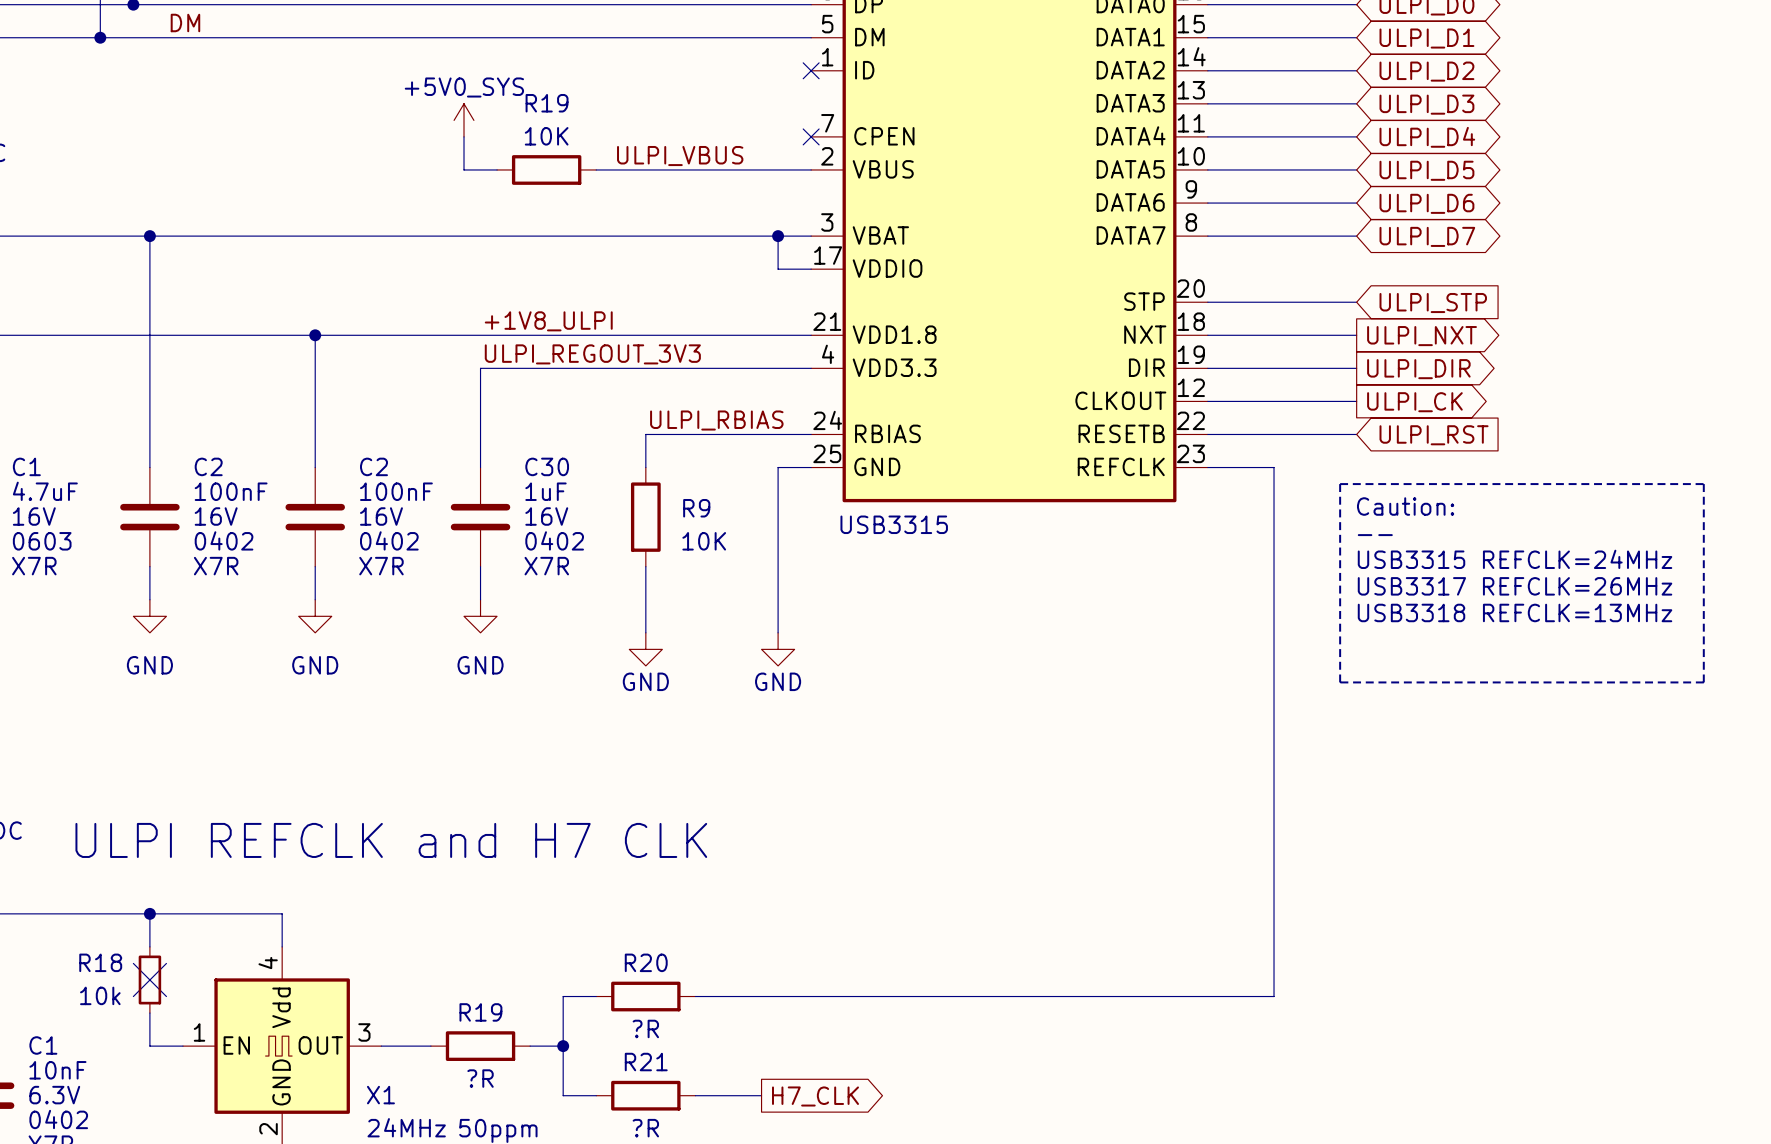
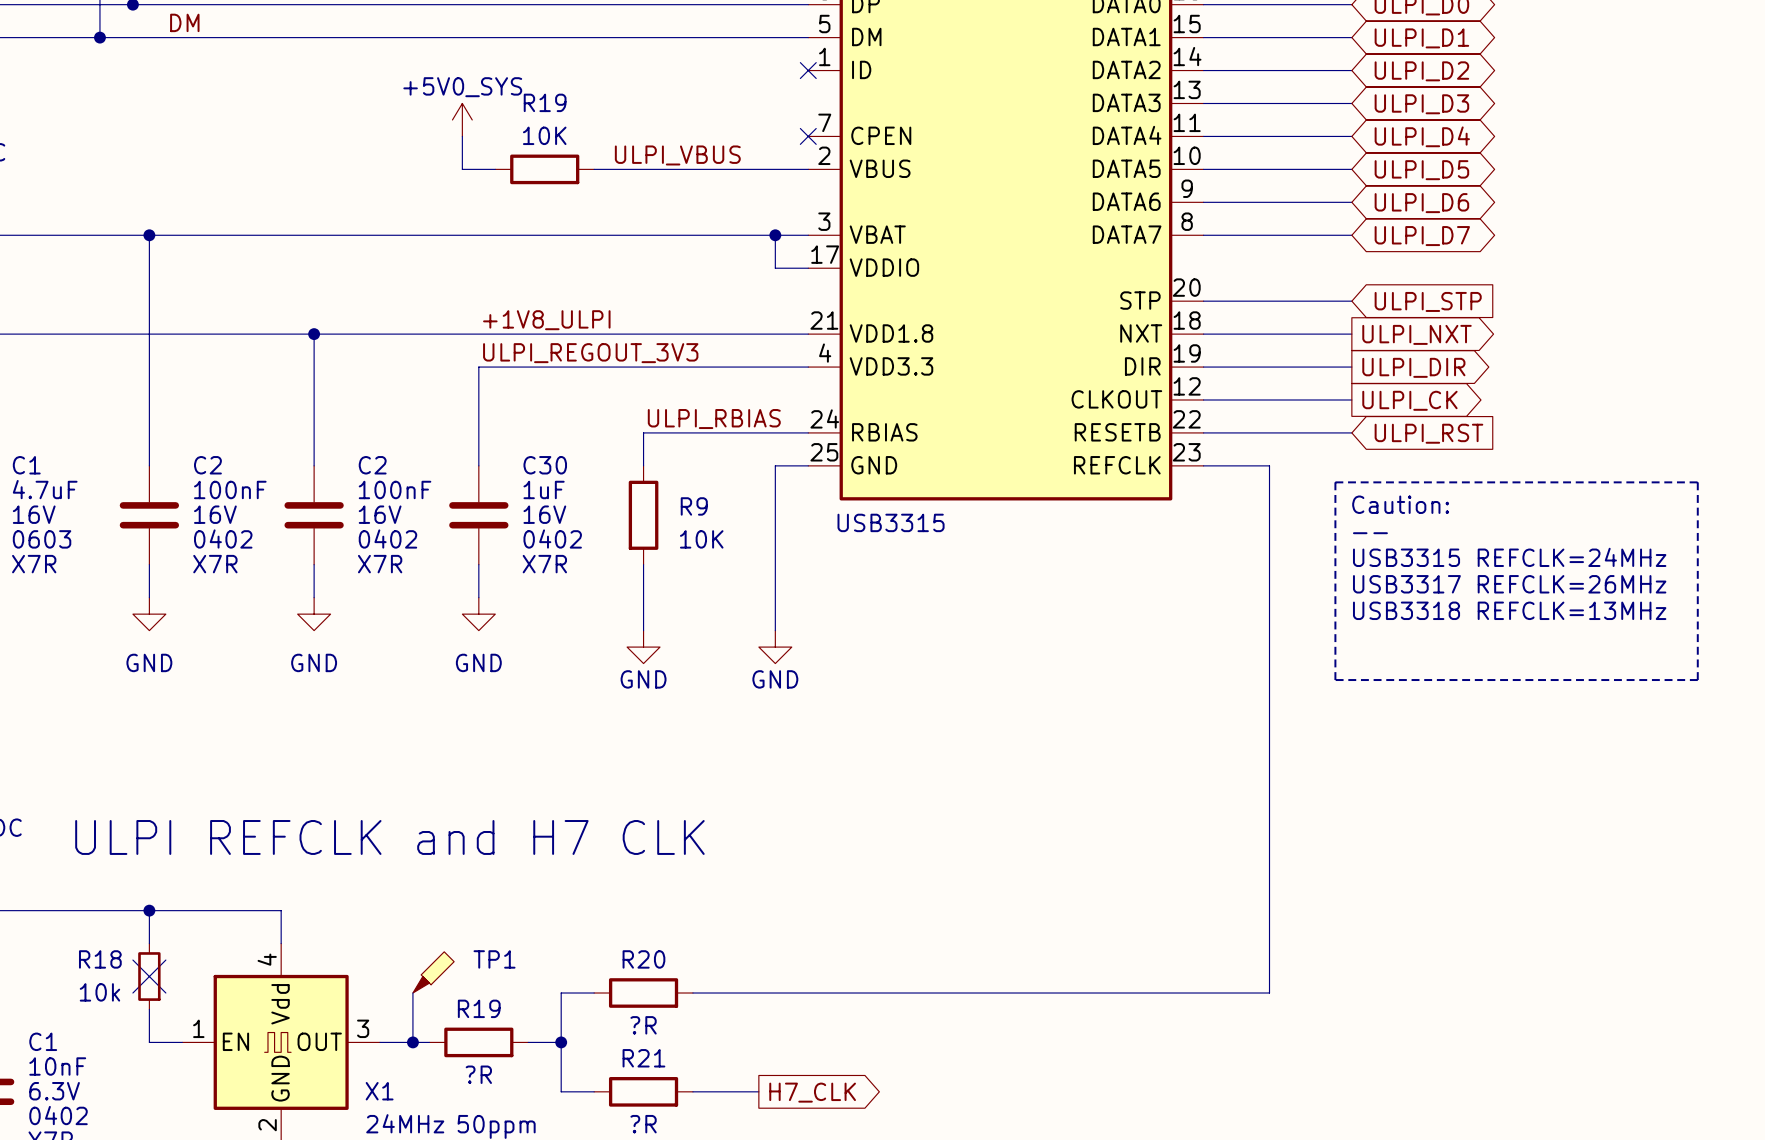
TP1: none -> (433, 972)
wire: none -> (412, 993) (412, 1042)
junction: none -> (412, 1042)

